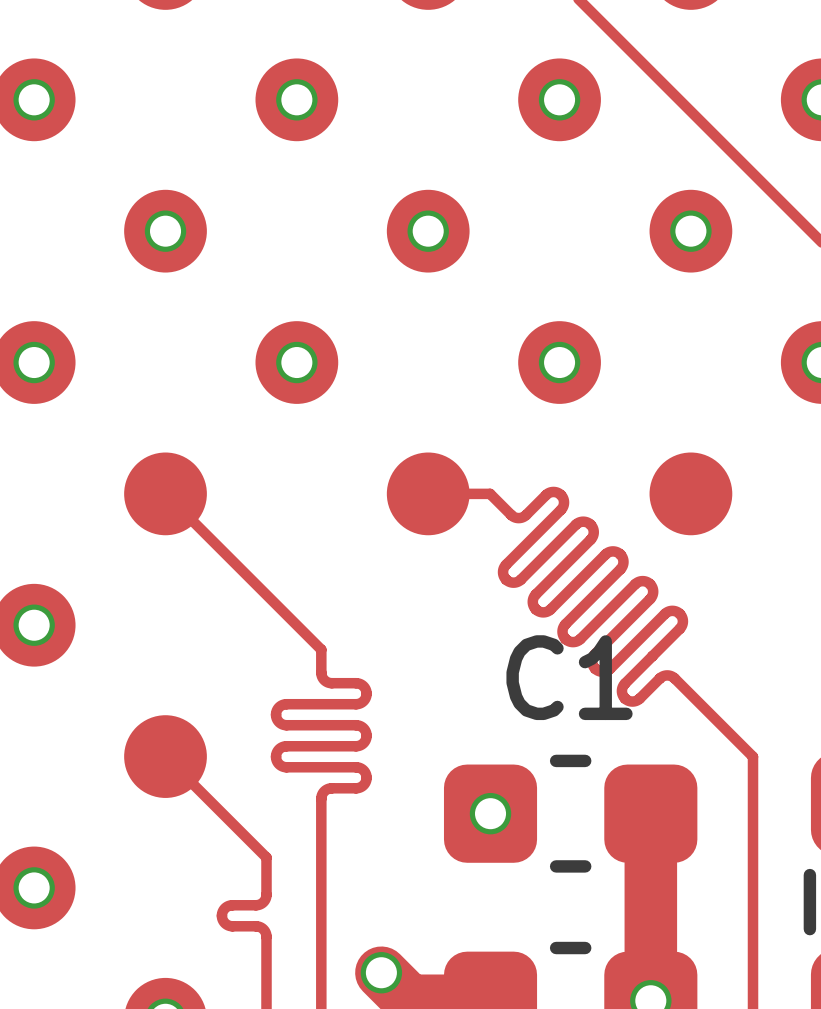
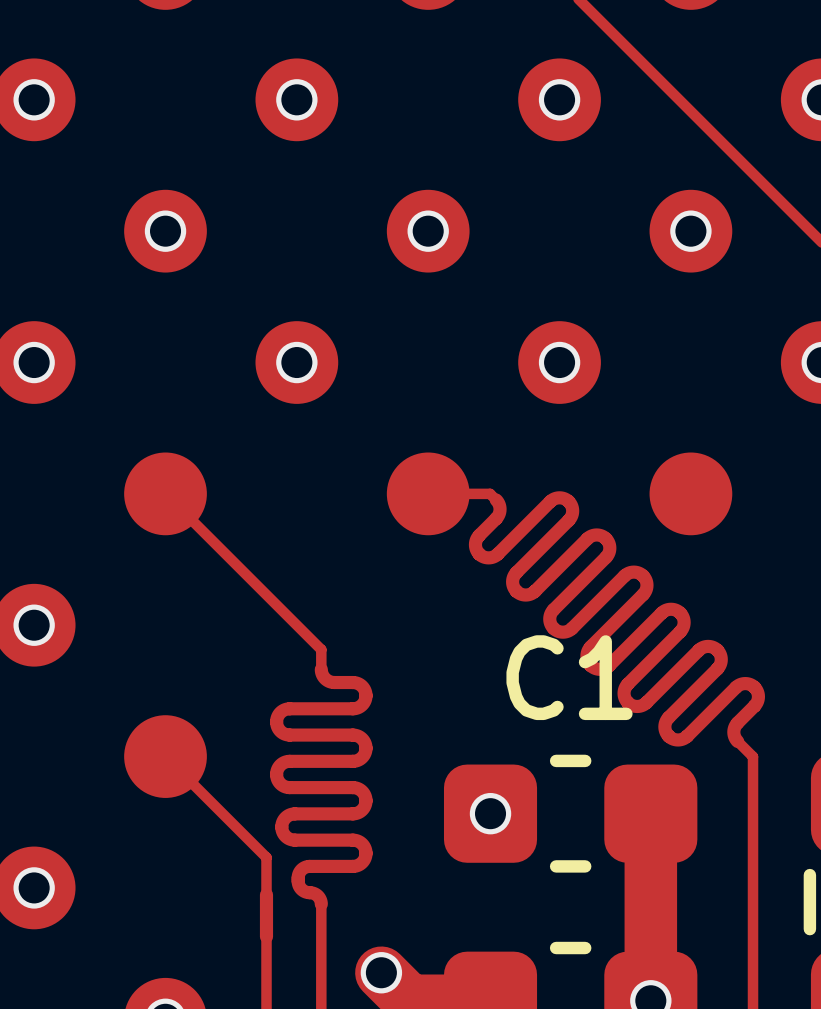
track: (496, 499) (512, 515) (518, 518) (525, 515) (550, 492) (559, 493) (563, 501) (560, 509) (505, 565) (503, 573) (506, 579) (512, 582) (519, 581) (576, 523) (582, 521) (588, 523) (593, 529) (592, 537) (535, 595) (532, 601) (534, 607) (540, 612) (548, 610) (606, 553) (611, 551) (618, 553) (623, 559) (621, 567) (564, 625) (562, 631) (564, 637) (570, 641) (578, 640) (636, 583) (642, 581) (648, 582) (652, 589) (651, 597) (594, 654) (592, 660) (593, 666) (600, 671) (608, 670) (665, 613) (671, 610) (676, 611) (682, 617) (681, 626) (624, 684) (622, 689) (622, 695) (627, 700) (635, 700) (660, 677) (670, 676) (737, 741) -> (496, 518) (476, 540) (476, 550) (484, 557) (490, 557) (496, 555) (552, 499) (561, 497) (568, 501) (572, 509) (570, 517) (515, 573) (512, 581) (514, 588) (522, 594) (532, 593) (588, 537) (596, 534) (604, 537) (609, 545) (607, 555) (552, 610) (549, 617) (551, 626) (559, 631) (569, 630) (625, 574) (633, 572) (640, 573) (646, 582) (644, 592) (589, 648) (586, 656) (588, 663) (597, 669) (607, 667) (663, 611) (669, 609) (677, 611) (683, 619) (682, 629) (626, 685) (624, 691) (625, 699) (634, 706) (644, 704) (700, 649) (706, 646) (713, 647) (720, 655) (719, 666) (667, 718) (665, 729) (672, 738) (679, 739) (684, 737) (737, 686) (747, 683) (755, 688) (758, 698) (755, 704) (735, 726) (734, 735) (737, 741)
track: none -> (496, 499) (500, 509) (496, 518)
track: (321, 669) (322, 677) (327, 682) (357, 683) (362, 685) (366, 692) (364, 700) (356, 704) (283, 704) (276, 712) (278, 721) (286, 725) (357, 725) (363, 728) (366, 735) (364, 742) (358, 745) (285, 746) (279, 749) (276, 754) (277, 762) (283, 766) (357, 767) (362, 769) (366, 775) (365, 781) (360, 787) (330, 788) (322, 794) (321, 904) -> (321, 669) (322, 675) (327, 680) (357, 683) (363, 687) (366, 695) (363, 703) (355, 708) (288, 708) (280, 712) (276, 719) (278, 728) (285, 734) (354, 735) (361, 737) (365, 745) (364, 755) (357, 760) (288, 761) (281, 764) (276, 771) (278, 781) (286, 787) (354, 787) (361, 790) (365, 796) (364, 806) (357, 813) (293, 813) (286, 816) (282, 822) (283, 832) (290, 839) (354, 840) (361, 843) (364, 847) (364, 858) (357, 865) (308, 866) (300, 870) (298, 877) (299, 887) (304, 891) (316, 895) (321, 904)
track: (266, 894) (265, 900) (260, 904) (229, 905) (224, 909) (221, 915) (224, 922) (228, 925) (258, 926) (264, 930) (266, 936) -> (266, 894) (266, 936)

